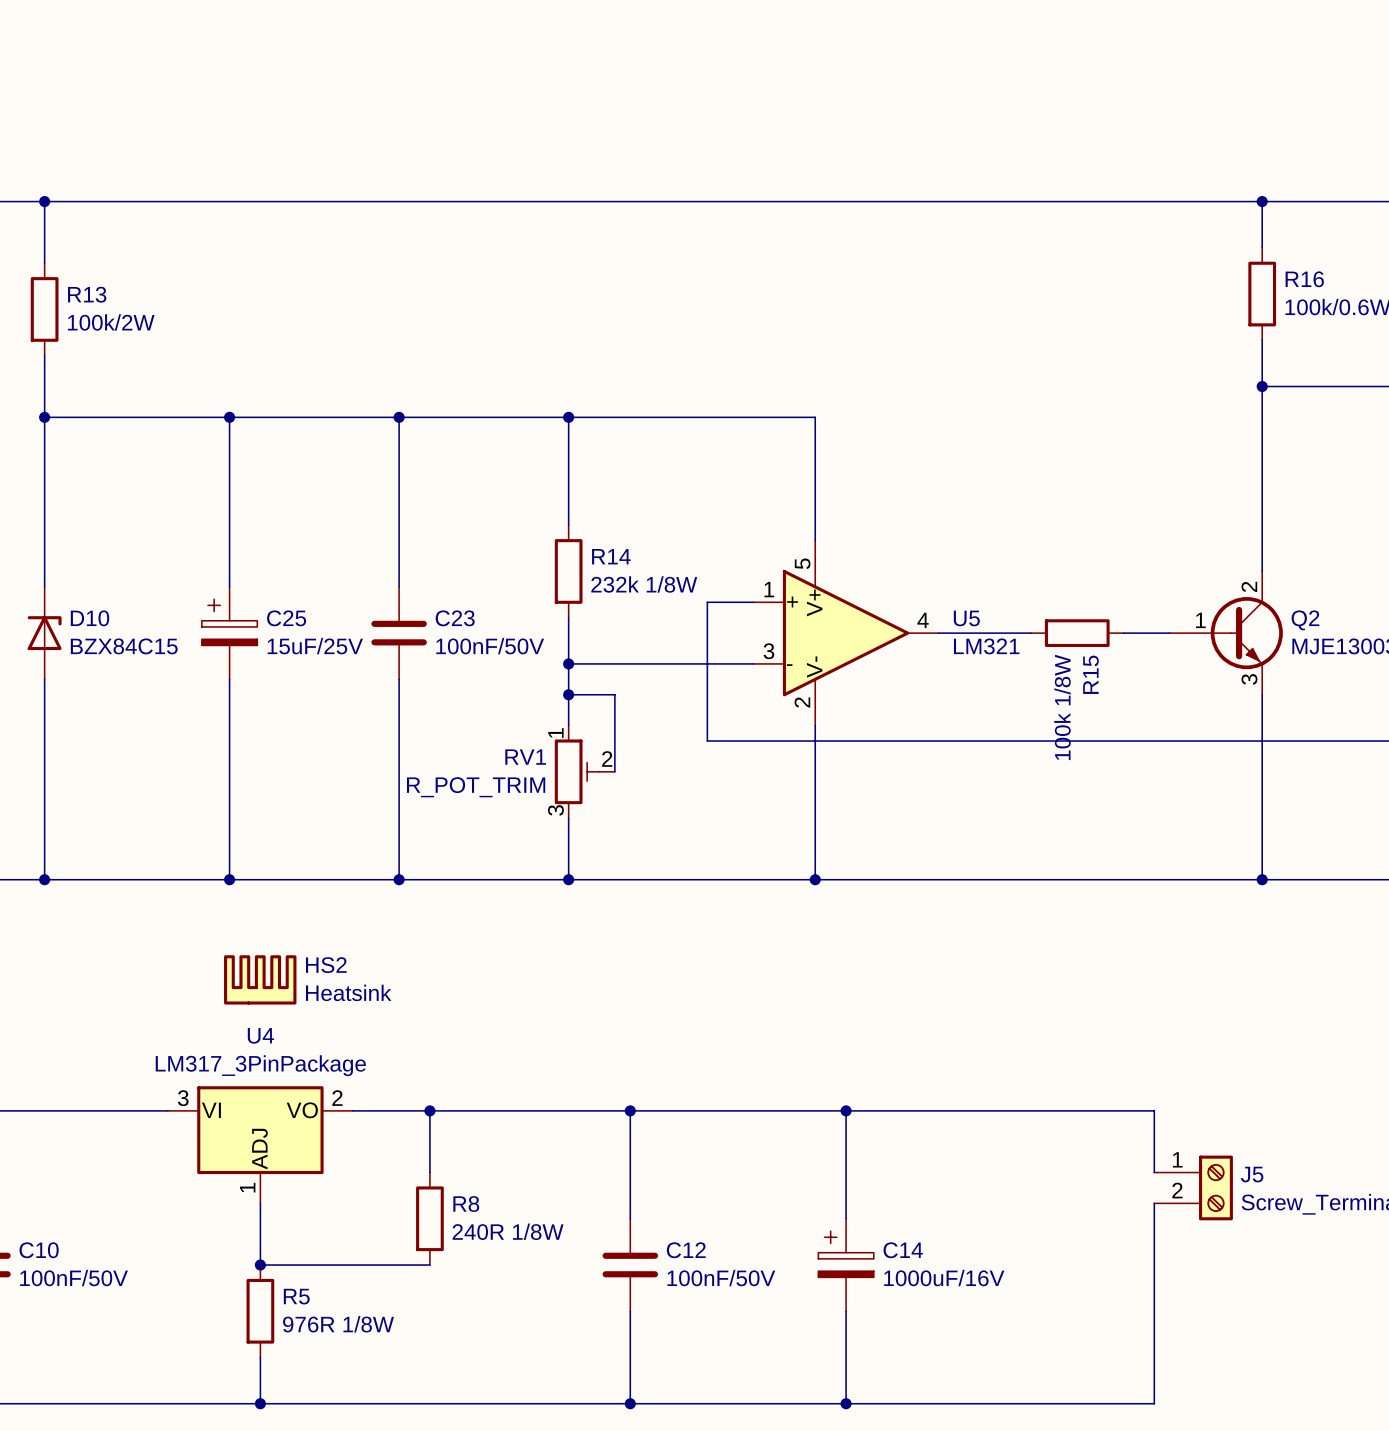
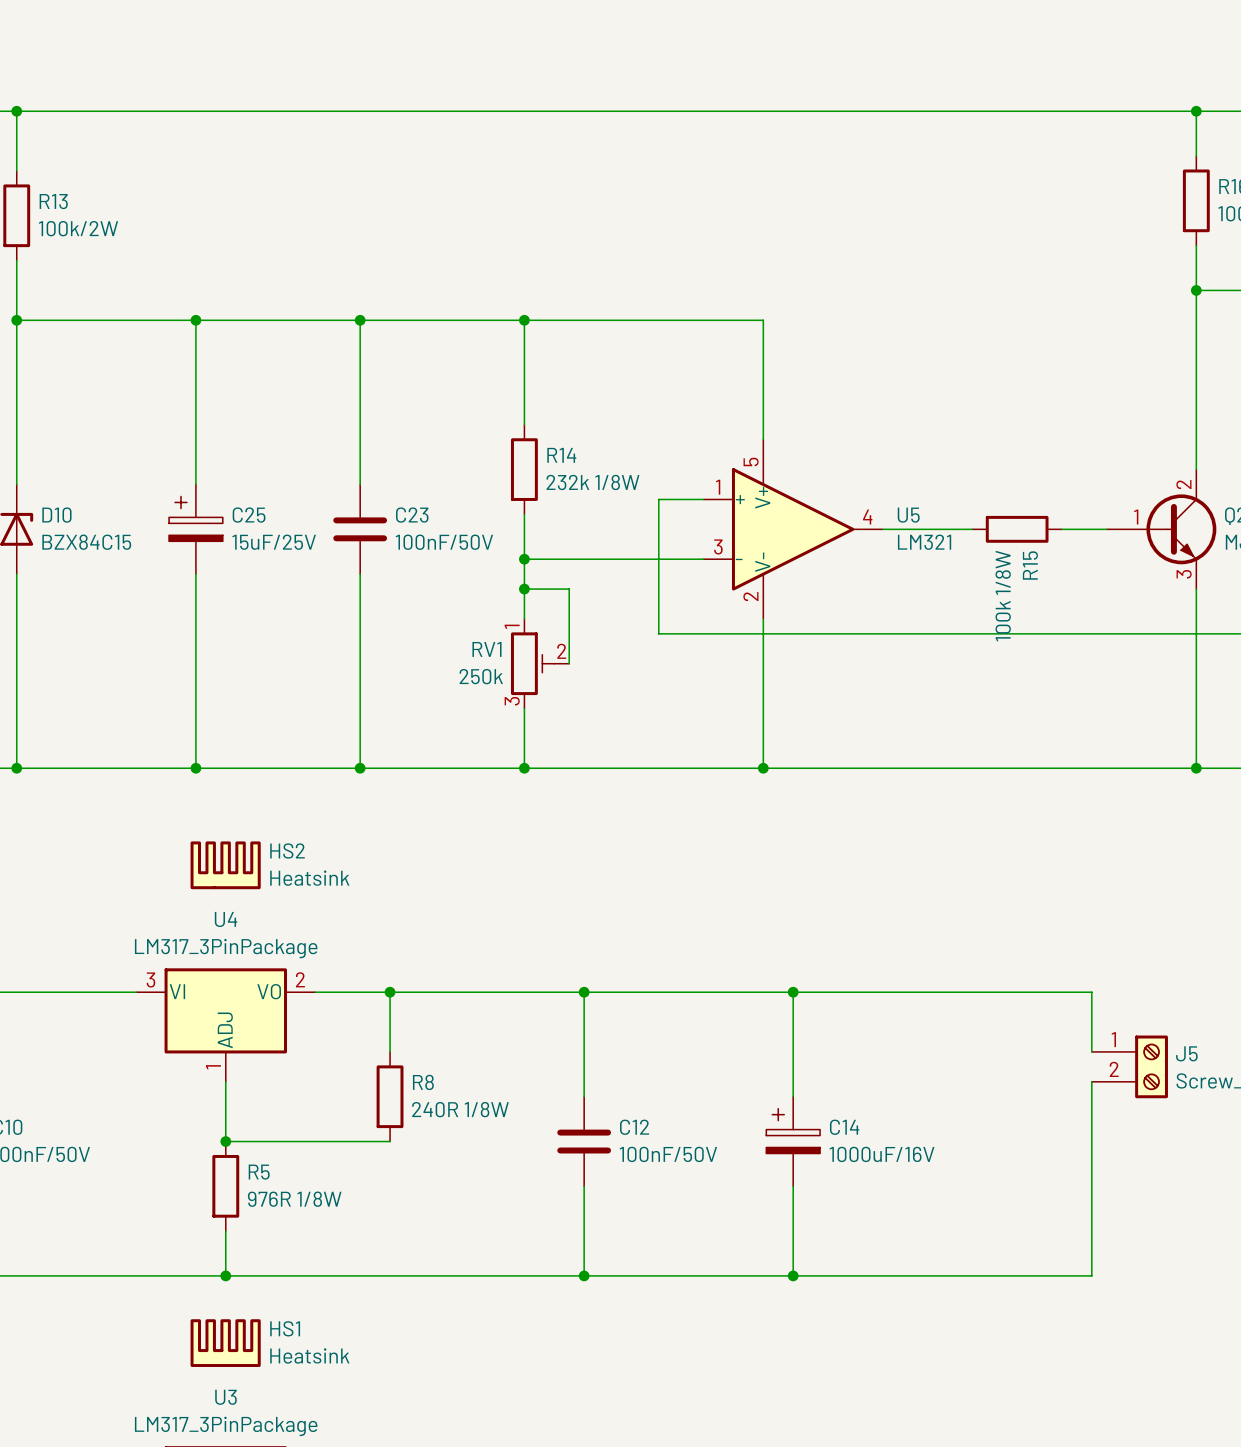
RV1 value: R_POT_TRIM (476, 787) -> 250k (481, 676)

